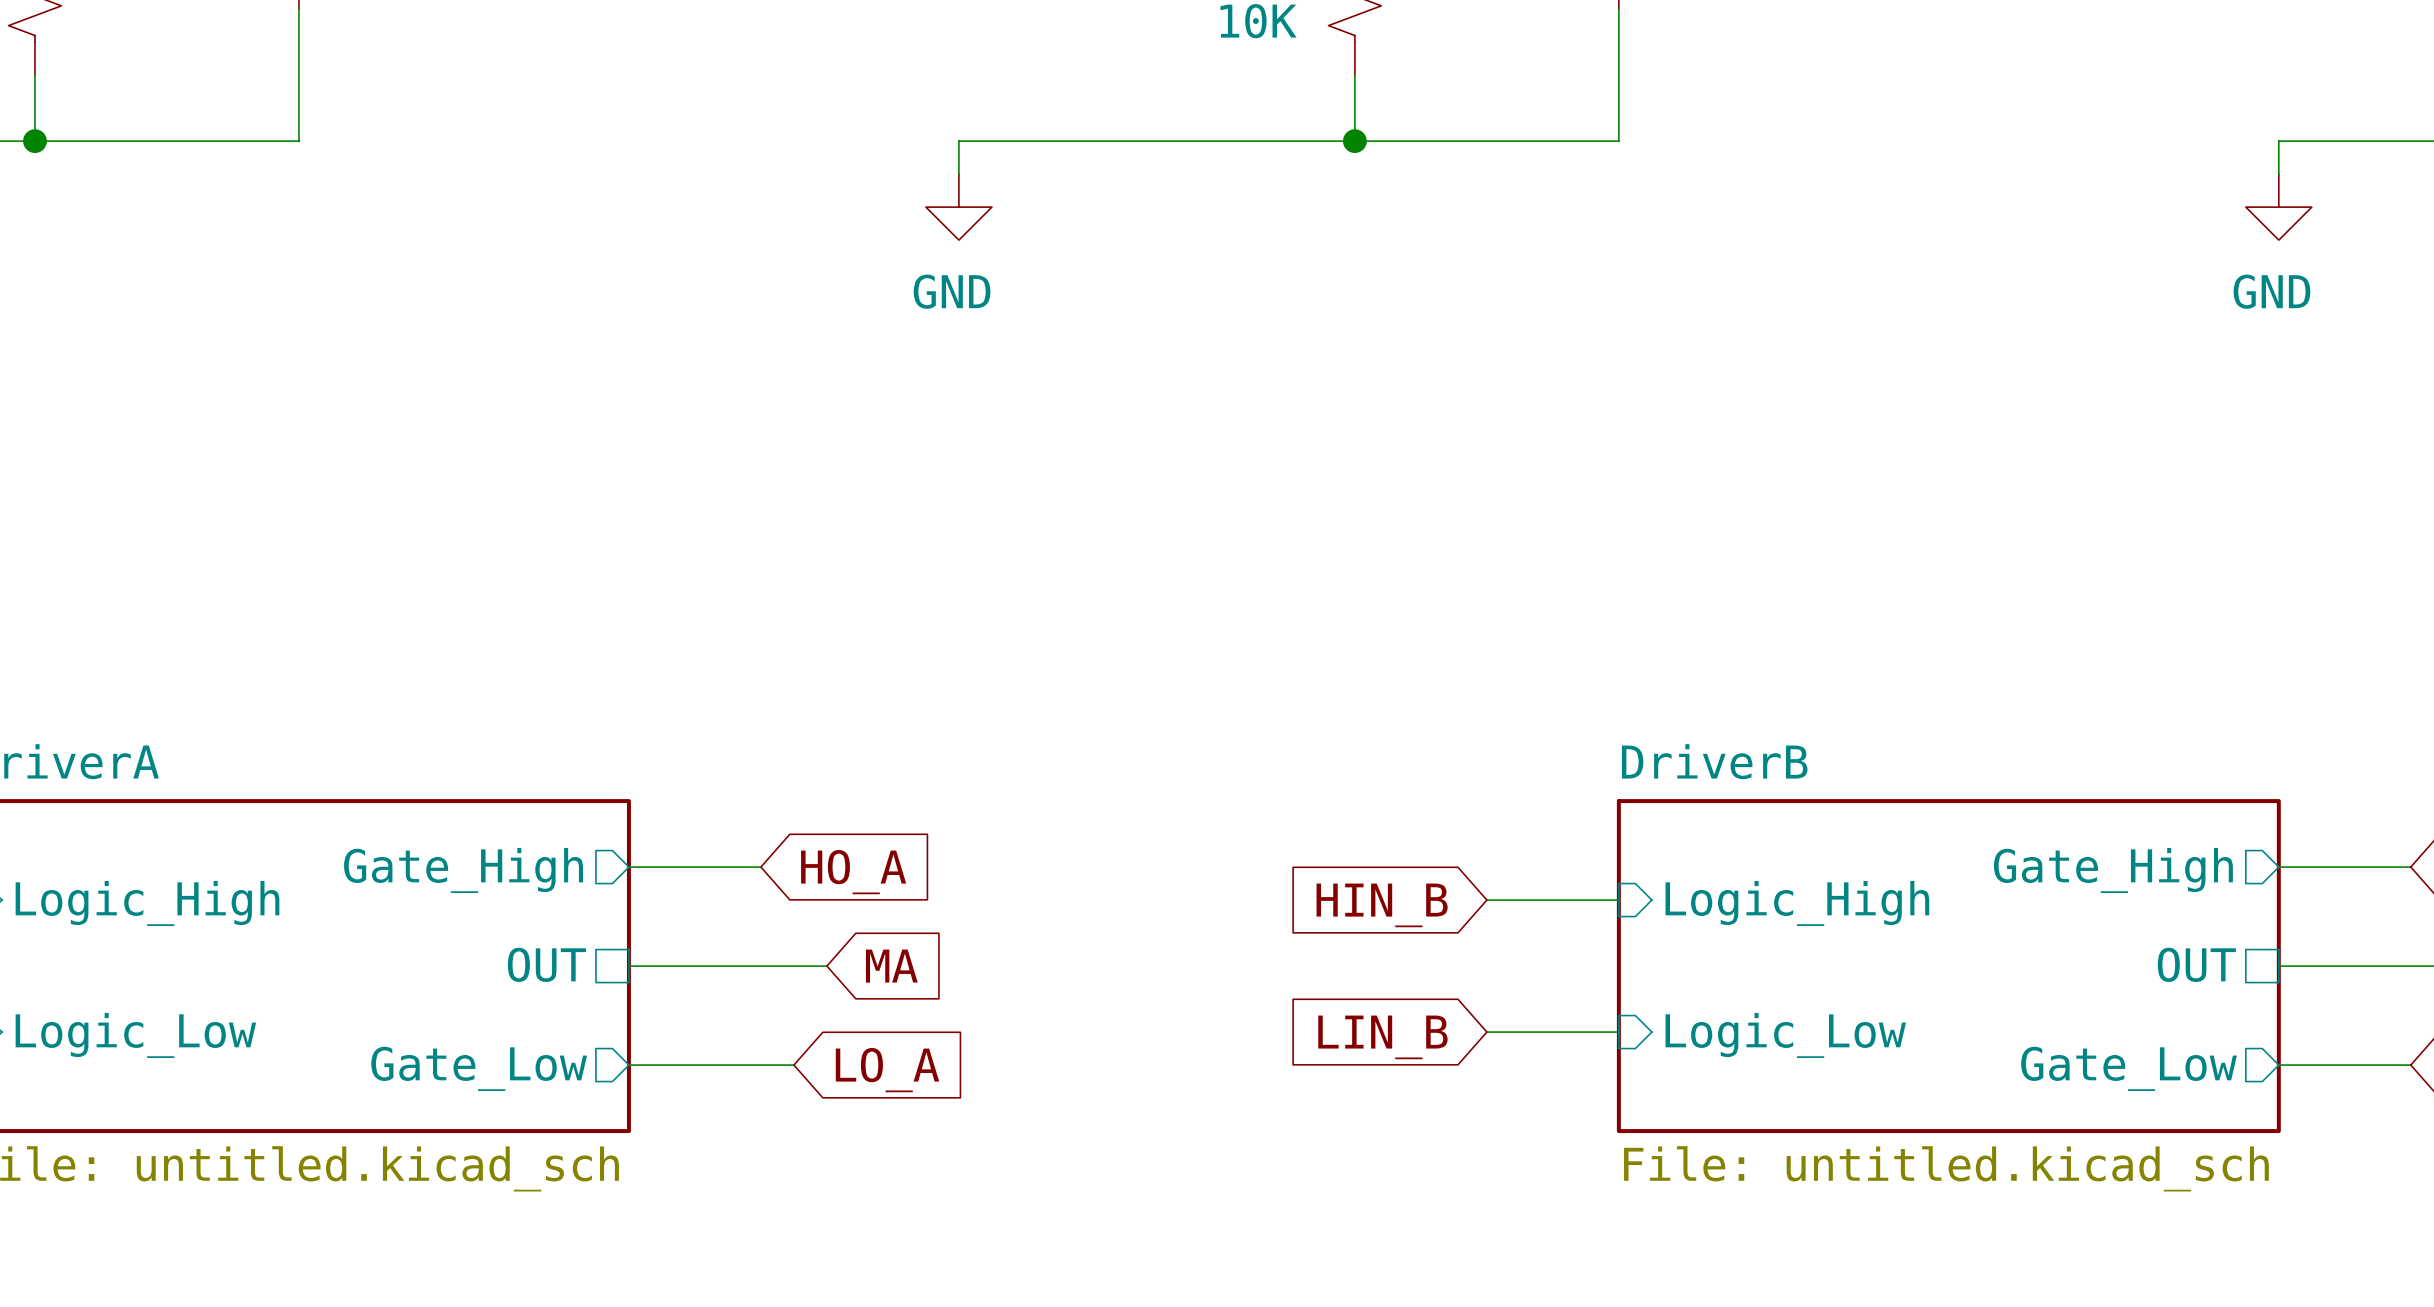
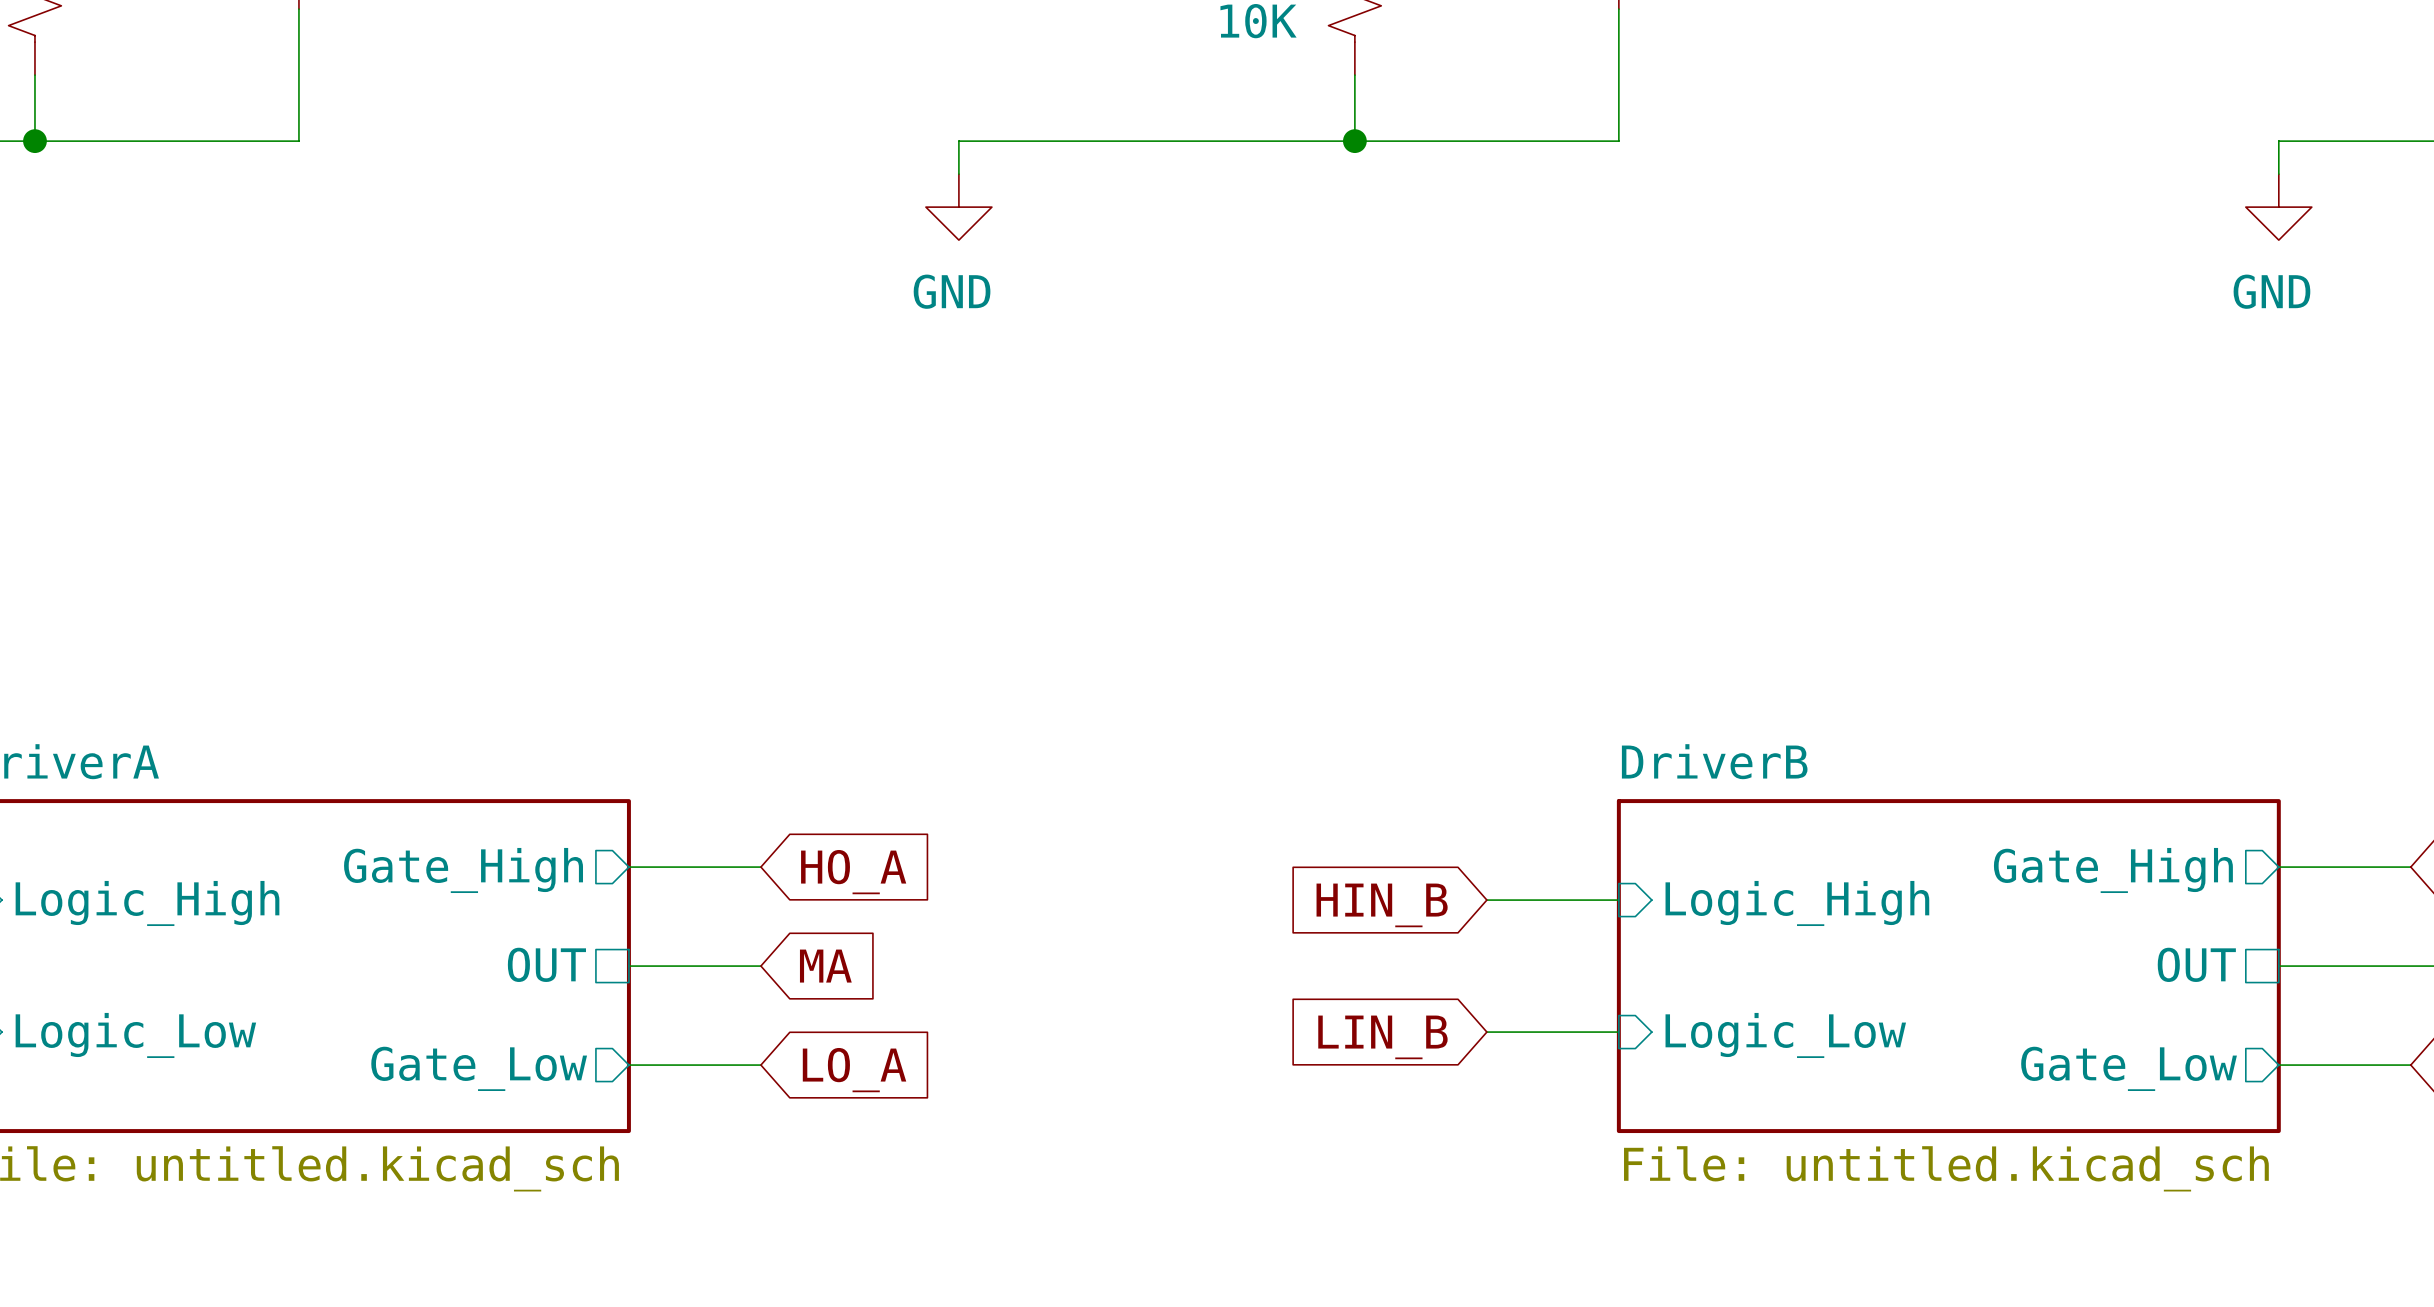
wire: (760, 966) (826, 966) -> none
global label position: MA (891, 966) -> MA (825, 966)
wire: (760, 1065) (793, 1065) -> none
global label position: LO_A (887, 1070) -> LO_A (854, 1070)

